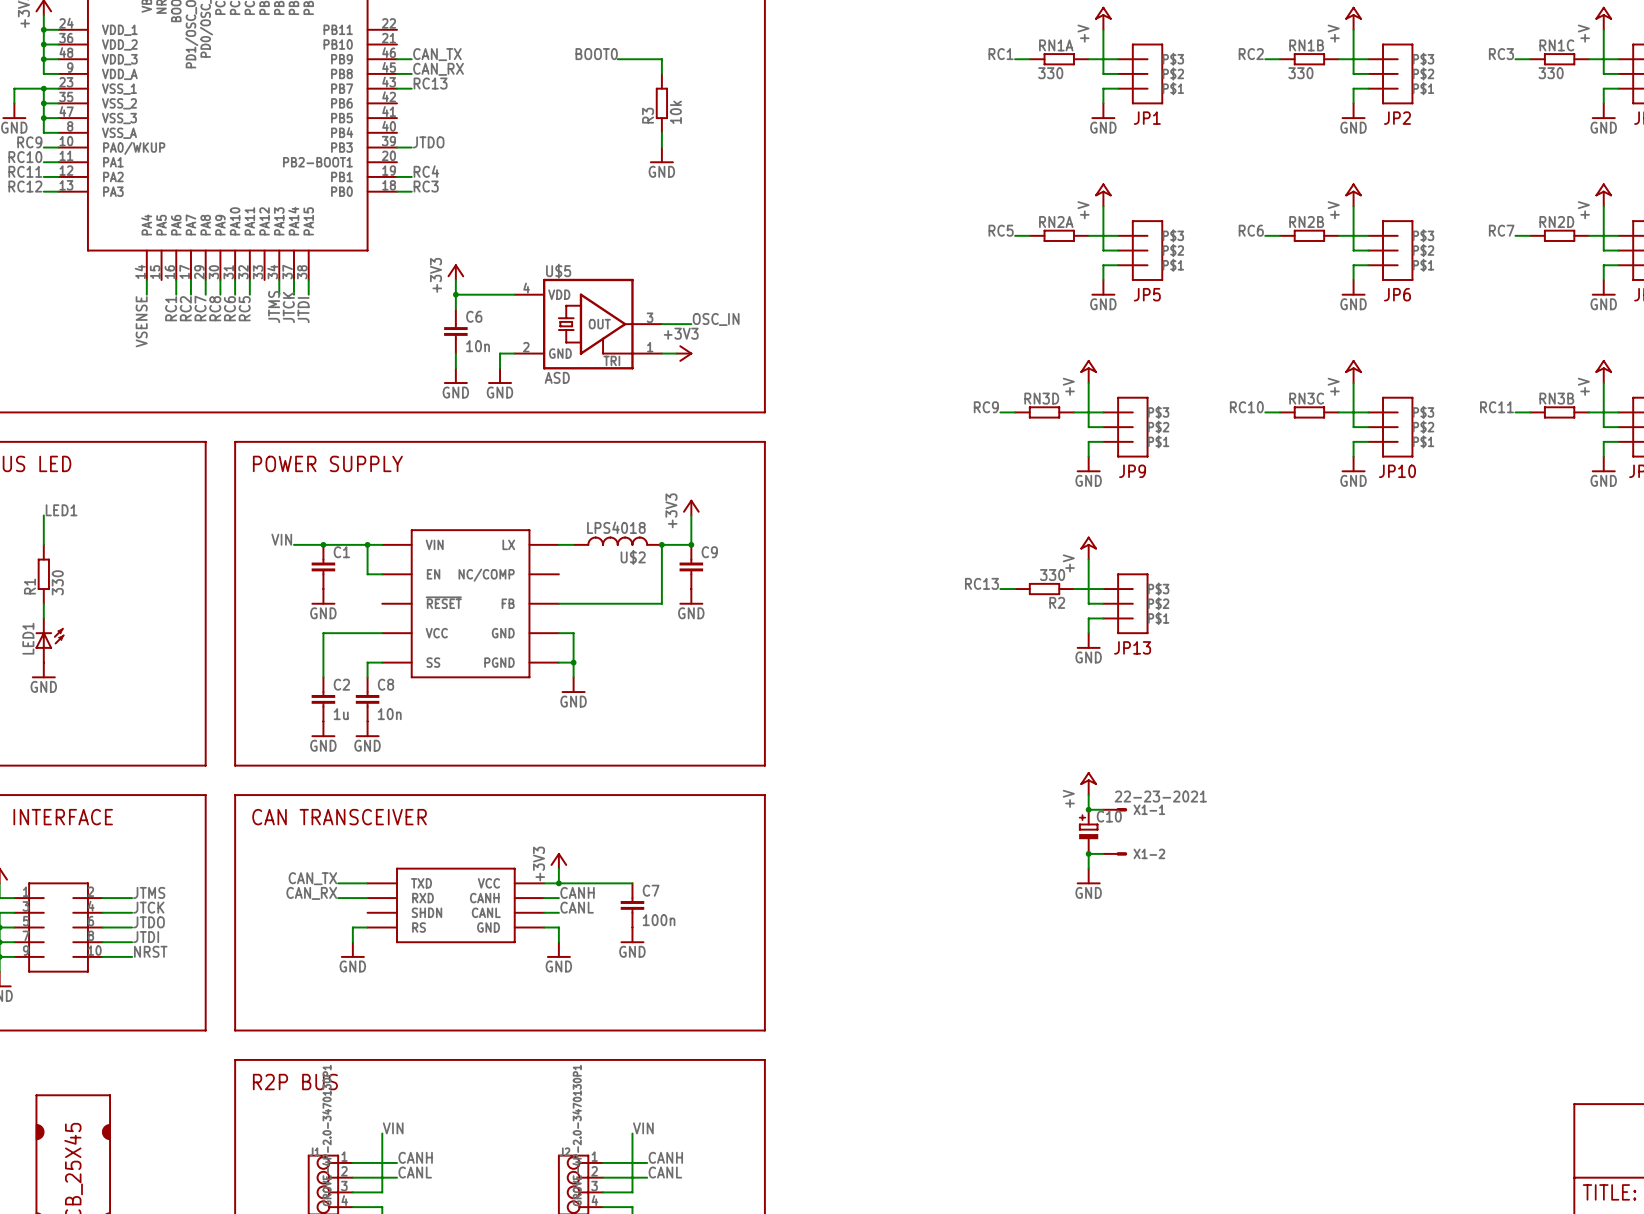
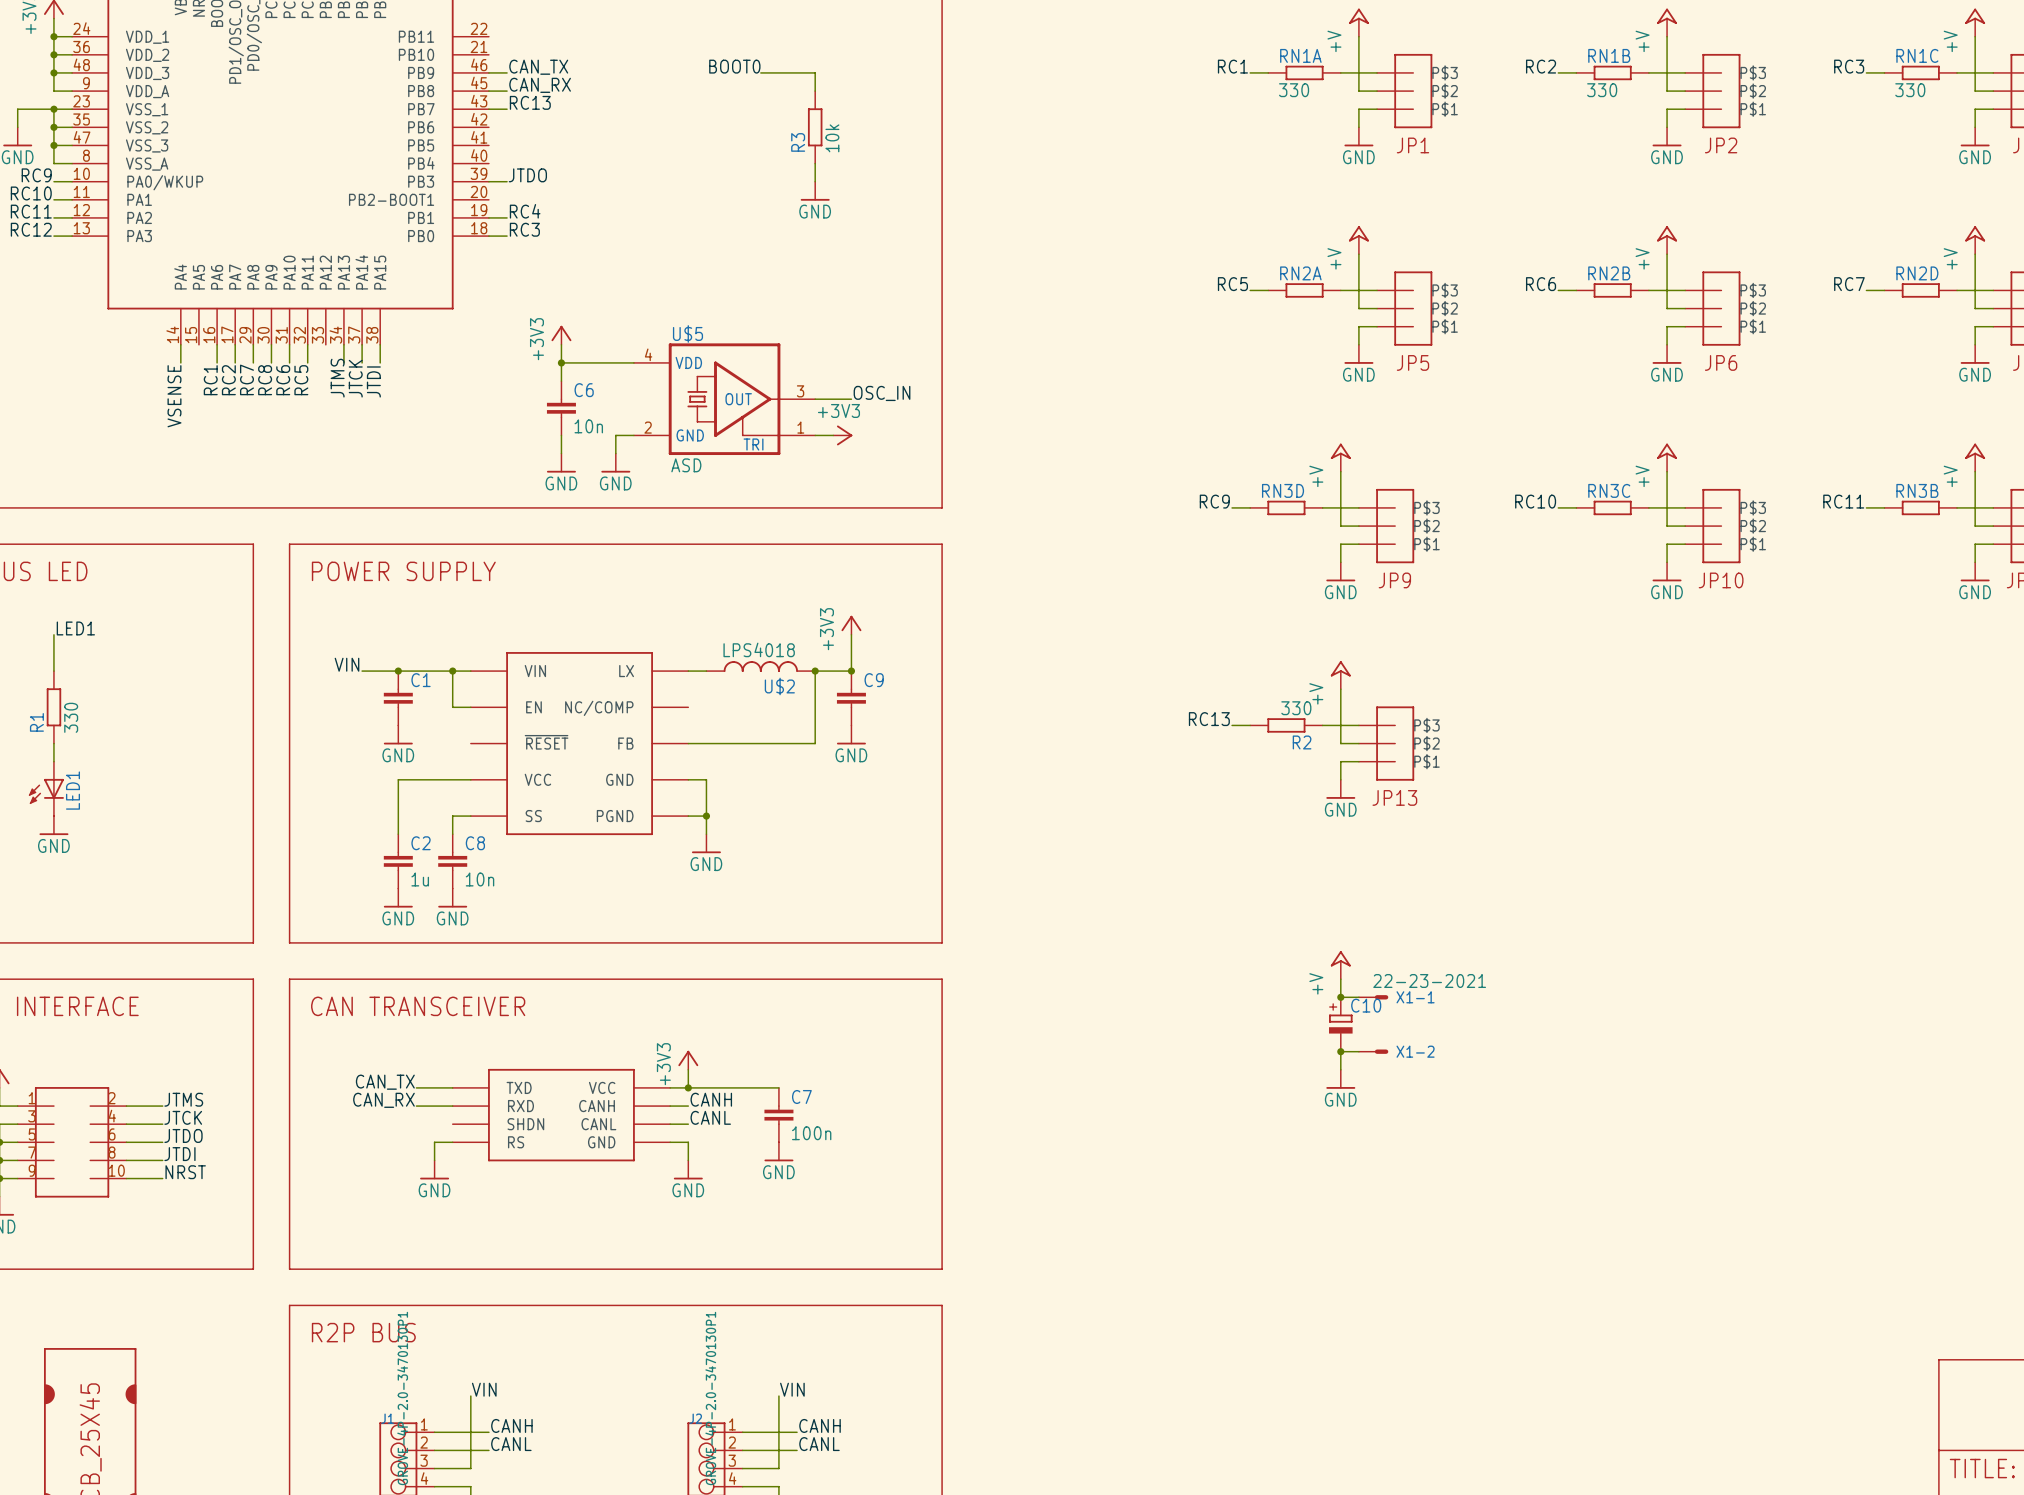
LED1 rotation: 0° (49, 638) -> 180° (46, 791)

